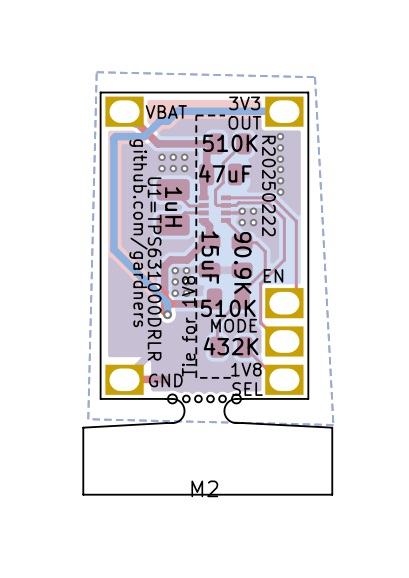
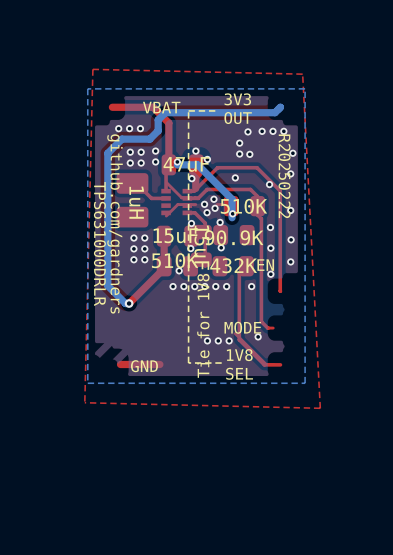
bottom zone outline: (96, 72) (88, 419) (333, 424) (315, 77) (96, 72) -> (305, 88) (305, 383) (87, 383) (87, 88) (305, 88)
top track: none -> (112, 107) (153, 107) (168, 123) (168, 164)
top track: (125, 111) (158, 143) (216, 143) (206, 153) (206, 181) -> none
bottom track: none -> (280, 107) (275, 112) (165, 112) (158, 119) (158, 130) (149, 139) (121, 139) (107, 153) (107, 285) (125, 303) (129, 303)
bottom track: (285, 115) (285, 111) (177, 111) (167, 121) (159, 121) (144, 136) (115, 136) (113, 138) (113, 249) (167, 303) (167, 314) -> none
via: none -> (118, 128)
via: none -> (129, 128)
via: none -> (140, 128)
via: none -> (262, 131)
via: (280, 136) -> none
via: none -> (272, 131)
via: none -> (283, 131)
via: none -> (247, 131)
part: 510K (230, 143) -> none
top track: (243, 143) (223, 163) (223, 182) (215, 190) (215, 203) (236, 205) (238, 202) (268, 202) (284, 218) (284, 259) (260, 283) (260, 322) (279, 341) -> (187, 198) (198, 198) (207, 189) (250, 189) (257, 196) (257, 215) (261, 218) (261, 321) (268, 328)
via: (280, 147) -> none
via: none -> (239, 143)
via: (173, 157) -> none
via: (184, 157) -> none
via: none -> (195, 151)
via: none -> (130, 152)
via: none -> (141, 152)
via: (280, 159) -> none
via: none -> (292, 153)
via: none -> (239, 154)
via: none -> (249, 154)
via: none -> (207, 159)
via: (173, 168) -> none
via: none -> (130, 163)
via: none -> (141, 163)
via: (280, 169) -> none
top track: none -> (168, 164) (166, 171) (166, 191)
bottom track: none -> (177, 164) (197, 164) (232, 199) (232, 217)
part position: (221, 174) -> (182, 164)
part footprint: [156, 179, 190, 236] -> [161, 188, 193, 216]
via: (280, 180) -> none
via: none -> (290, 173)
via: none -> (191, 178)
via: none -> (235, 177)
text position: R20250222 (268, 186) -> R20250222 (284, 176)
top track: none -> (132, 183) (136, 183) (151, 198) (166, 198)
top track: (225, 197) (272, 197) (296, 221) (296, 291) (284, 303) -> none
top track: none -> (187, 191) (194, 191) (217, 167) (257, 167) (280, 190) (280, 291)
part value: 1uH (173, 206) -> TPS631000DRLR (99, 244)
via: none -> (213, 199)
part: none -> 1uH (132, 200)
part: U1=TPS631000DRLR (214, 209) -> none
via: (242, 211) -> none
via: (253, 211) -> none
via: none -> (204, 204)
part: none -> 510K (244, 206)
via: none -> (215, 208)
via: none -> (290, 210)
top track: (225, 220) (242, 236) (242, 242) (256, 242) (265, 251) (265, 269) (242, 292) (242, 298) (217, 323) (217, 347) -> none
top track: none -> (187, 212) (194, 212) (205, 223) (205, 266)
via: none -> (207, 212)
top track: (203, 222) (209, 226) (209, 241) (205, 241) (187, 259) (170, 259) (164, 266) (164, 311) (167, 314) -> none
via: (253, 222) -> none
via: none -> (220, 222)
via: none -> (191, 223)
text position: github.com/gardners (138, 233) -> github.com/gardners (115, 223)
via: none -> (270, 227)
part: none -> 15uF (177, 236)
top track: none -> (164, 236) (164, 268) (129, 303)
via: none -> (133, 238)
via: none -> (144, 238)
via: none -> (291, 239)
part rotation: 0° (242, 256) -> 90° clockwise (233, 235)
M2: (204, 257) -> none
via: none -> (221, 247)
via: none -> (190, 248)
via: none -> (270, 248)
via: none -> (133, 248)
via: none -> (144, 248)
via: none -> (133, 259)
via: none -> (144, 259)
via: (175, 270) -> none
via: (186, 270) -> none
via: none -> (290, 261)
part: none -> 510K (177, 266)
top track: none -> (246, 266) (239, 273) (239, 339) (264, 364) (280, 364)
via: (175, 281) -> none
via: none -> (270, 274)
via: (175, 293) -> none
via: (186, 293) -> none
top track: (164, 297) (170, 303) (209, 303) (214, 298) -> none
via: none -> (173, 286)
via: none -> (183, 286)
via: none -> (194, 286)
via: none -> (204, 286)
via: none -> (215, 286)
part: 510K (228, 298) -> none
via: none -> (226, 286)
via: none -> (251, 286)
via position: (167, 314) -> (129, 303)
text position: MODE (234, 325) -> MODE (242, 327)
text position: Tie for 1V8 (188, 326) -> Tie for 1V8 (203, 325)
part position: (231, 347) -> (233, 266)
via: none -> (258, 336)
via: none -> (207, 340)
via: none -> (218, 340)
via: none -> (229, 340)
text position: GND (165, 380) -> GND (144, 366)
board edge: (242, 423) (332, 427) (332, 494) (83, 494) (83, 427) (166, 423) -> none

